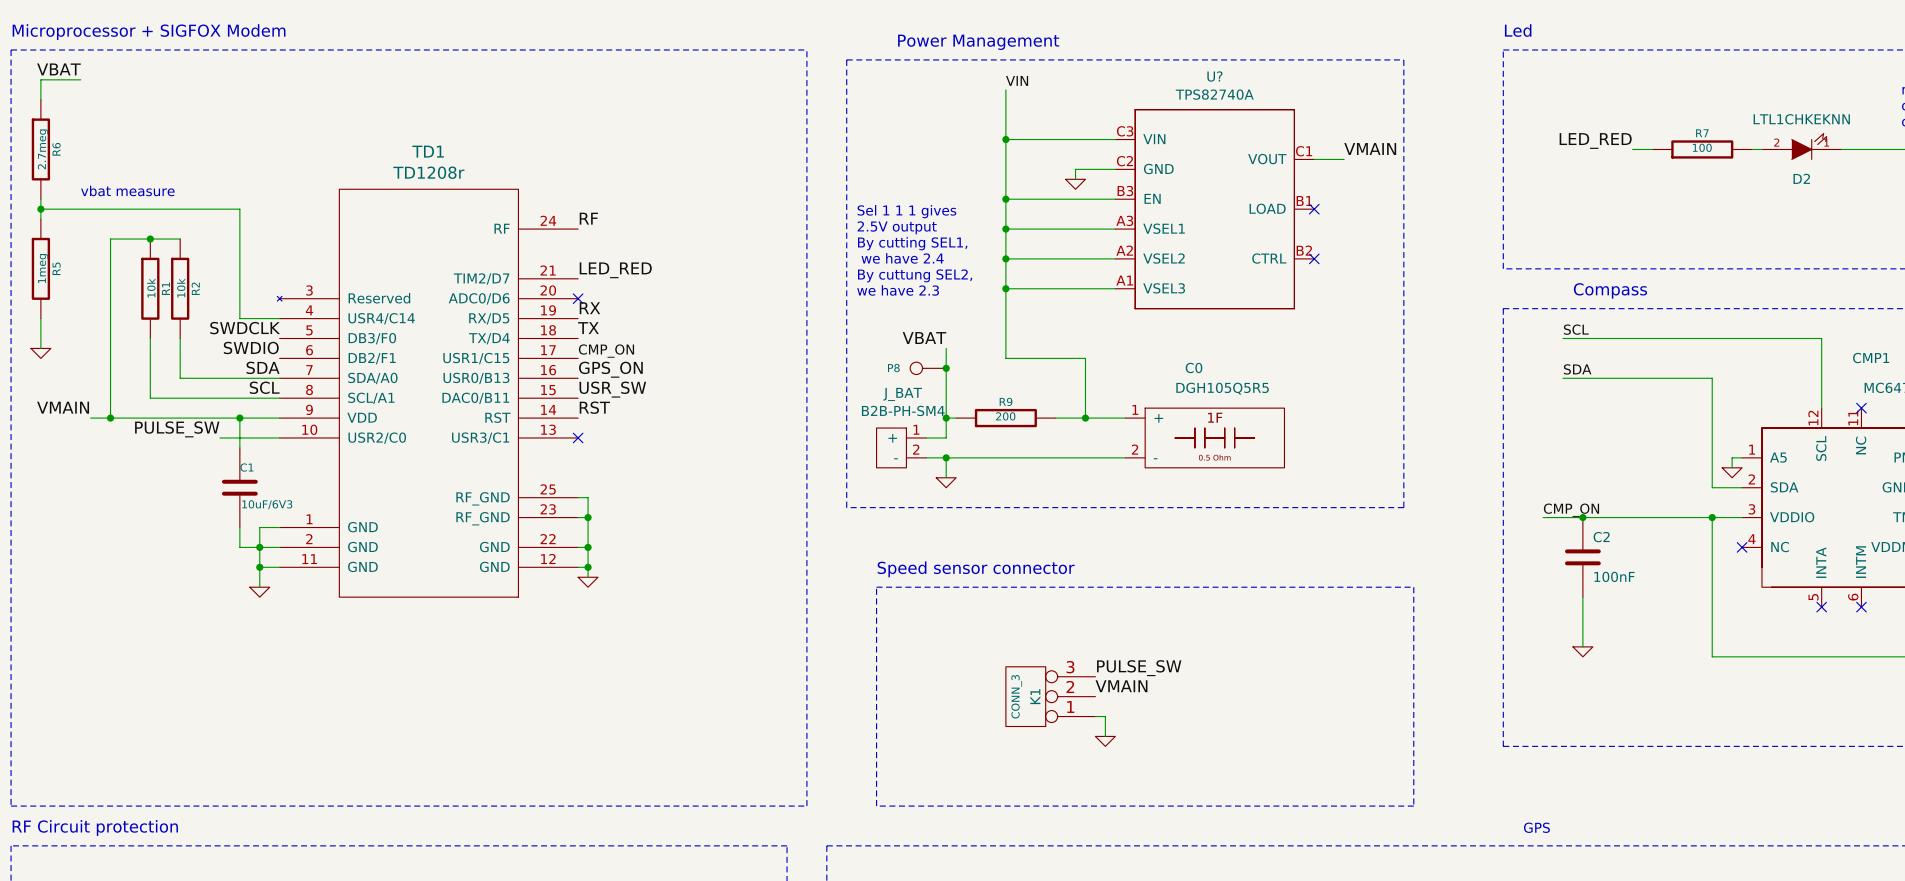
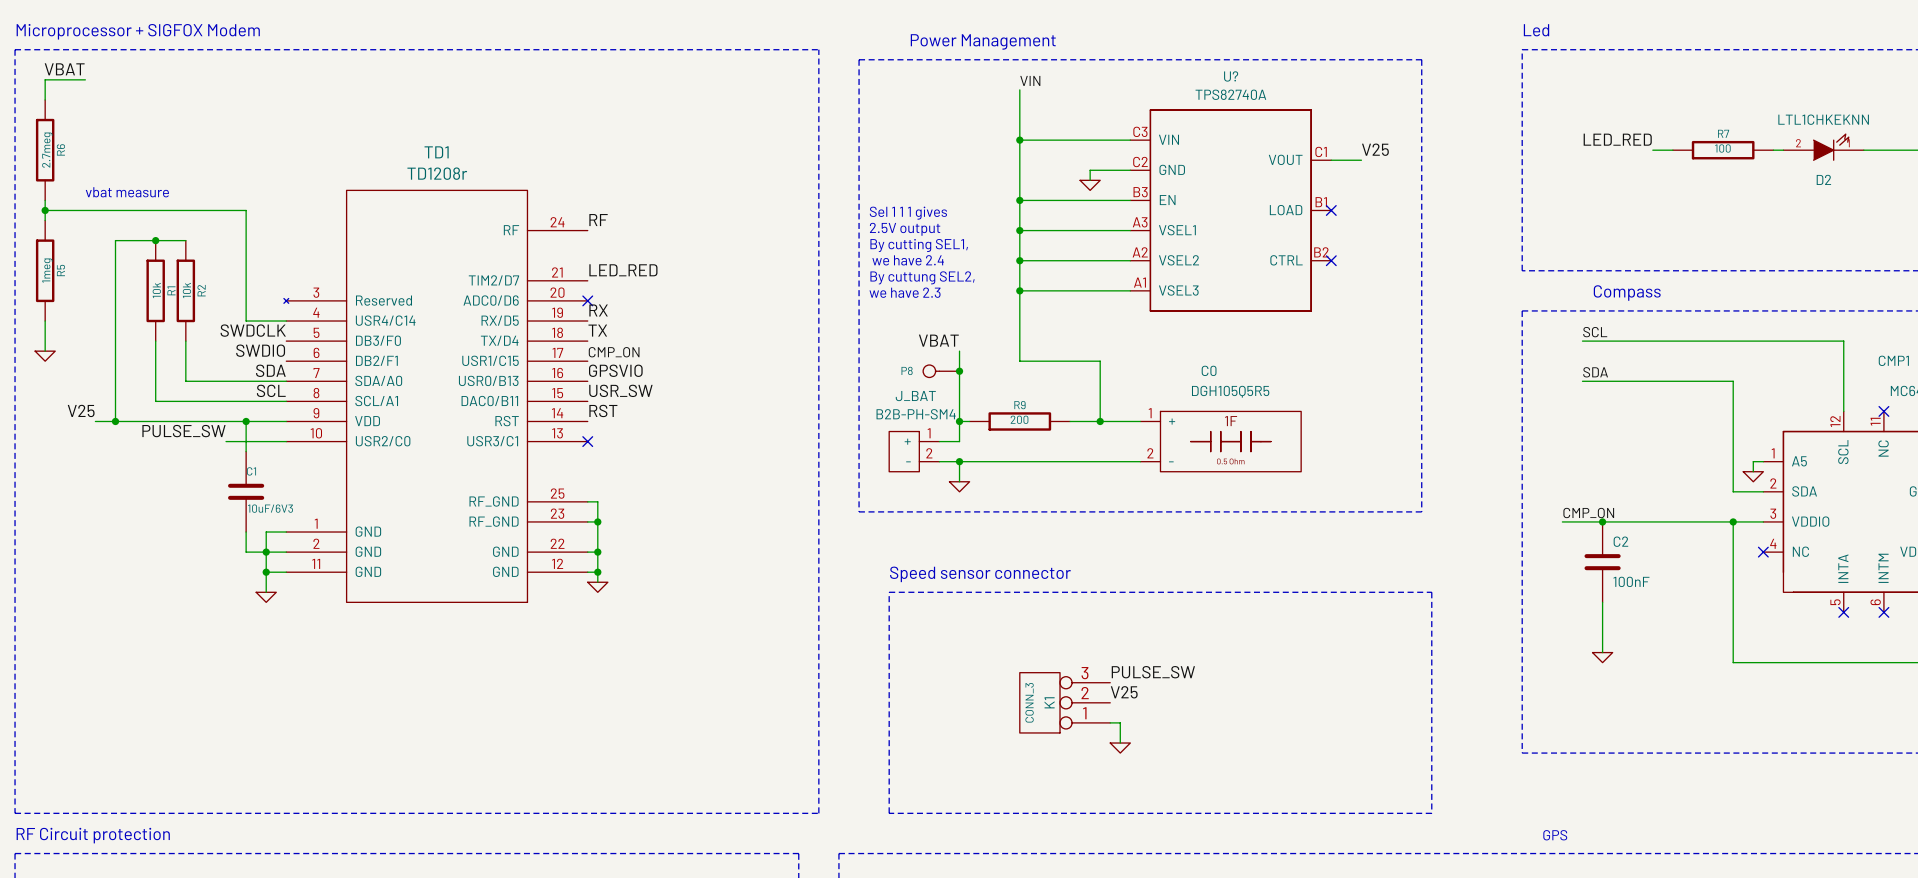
label: VMAIN (1370, 149) -> V25 (1375, 149)
label: GPS_ON (610, 369) -> GPSVIO (615, 370)
label: VMAIN (63, 407) -> V25 (81, 410)
label: VMAIN (1121, 686) -> V25 (1124, 692)

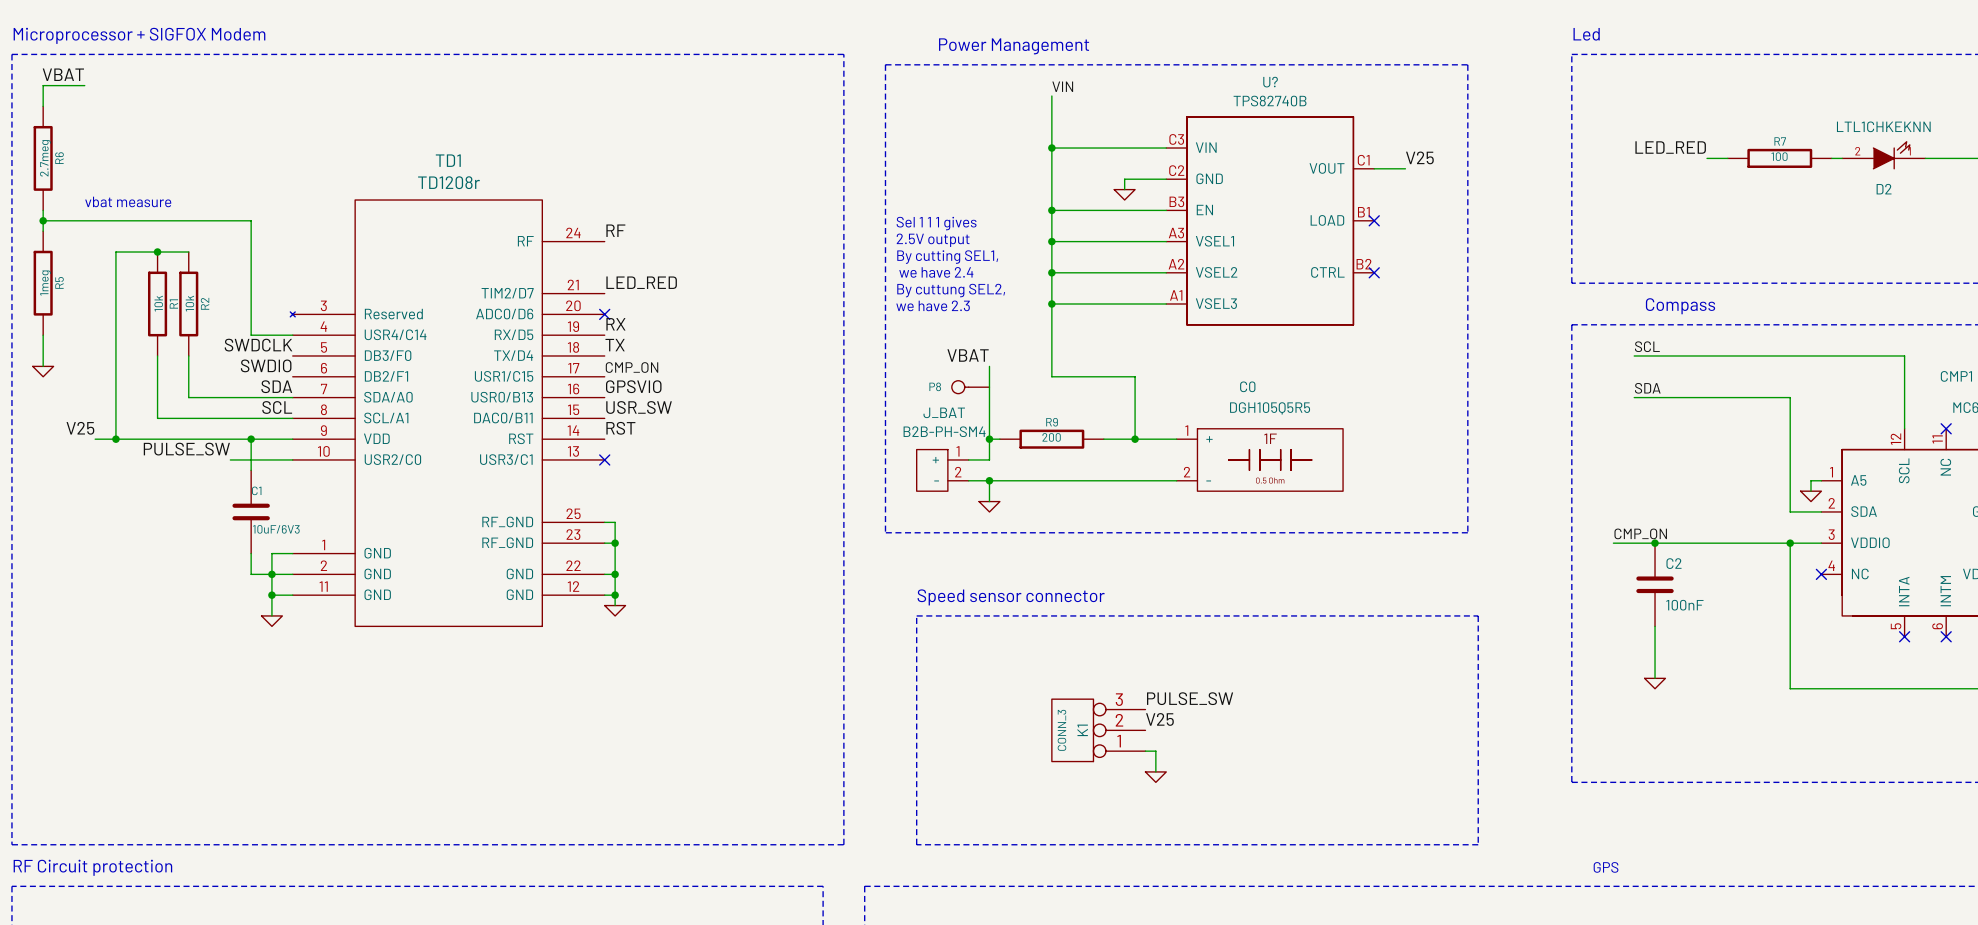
U? value: TPS82740A (1230, 94) -> TPS82740B (1270, 101)
junction: (959, 371) -> none

